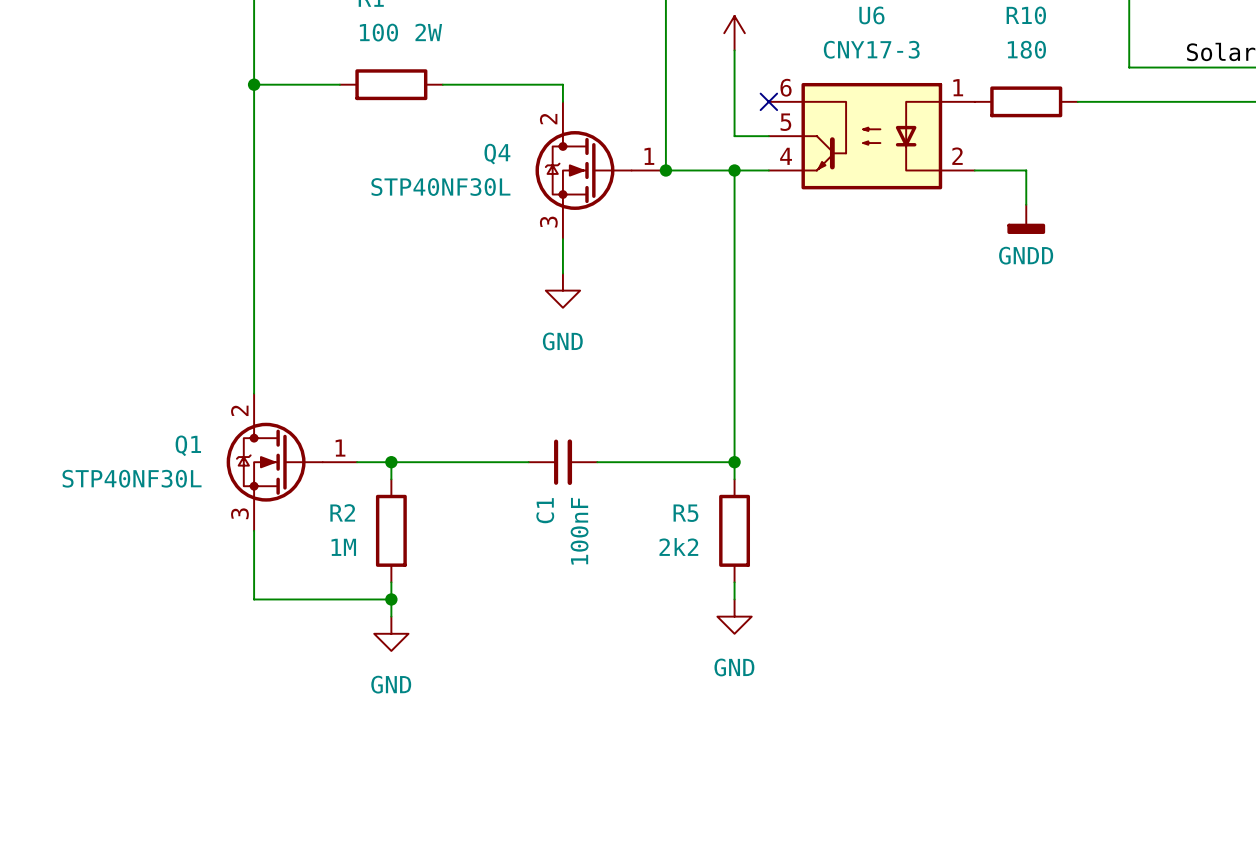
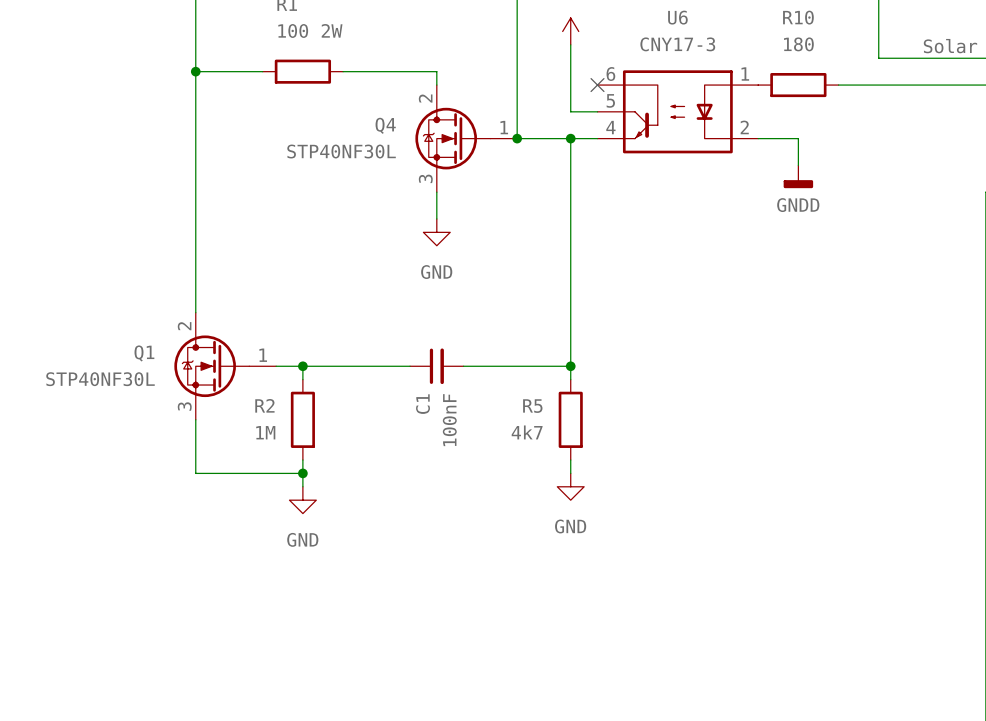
R5 value: 2k2 (678, 546) -> 4k7 (527, 432)

